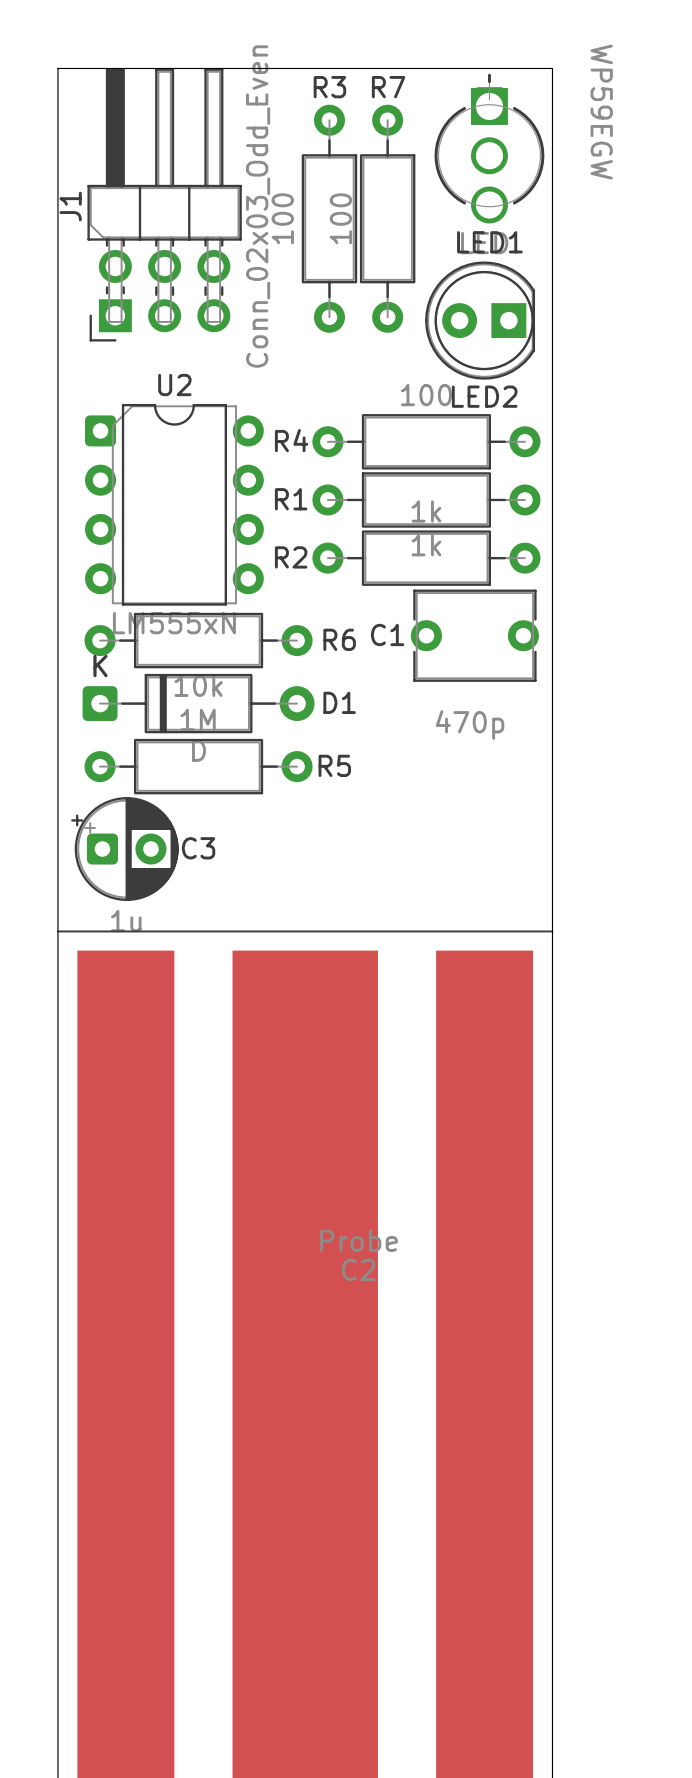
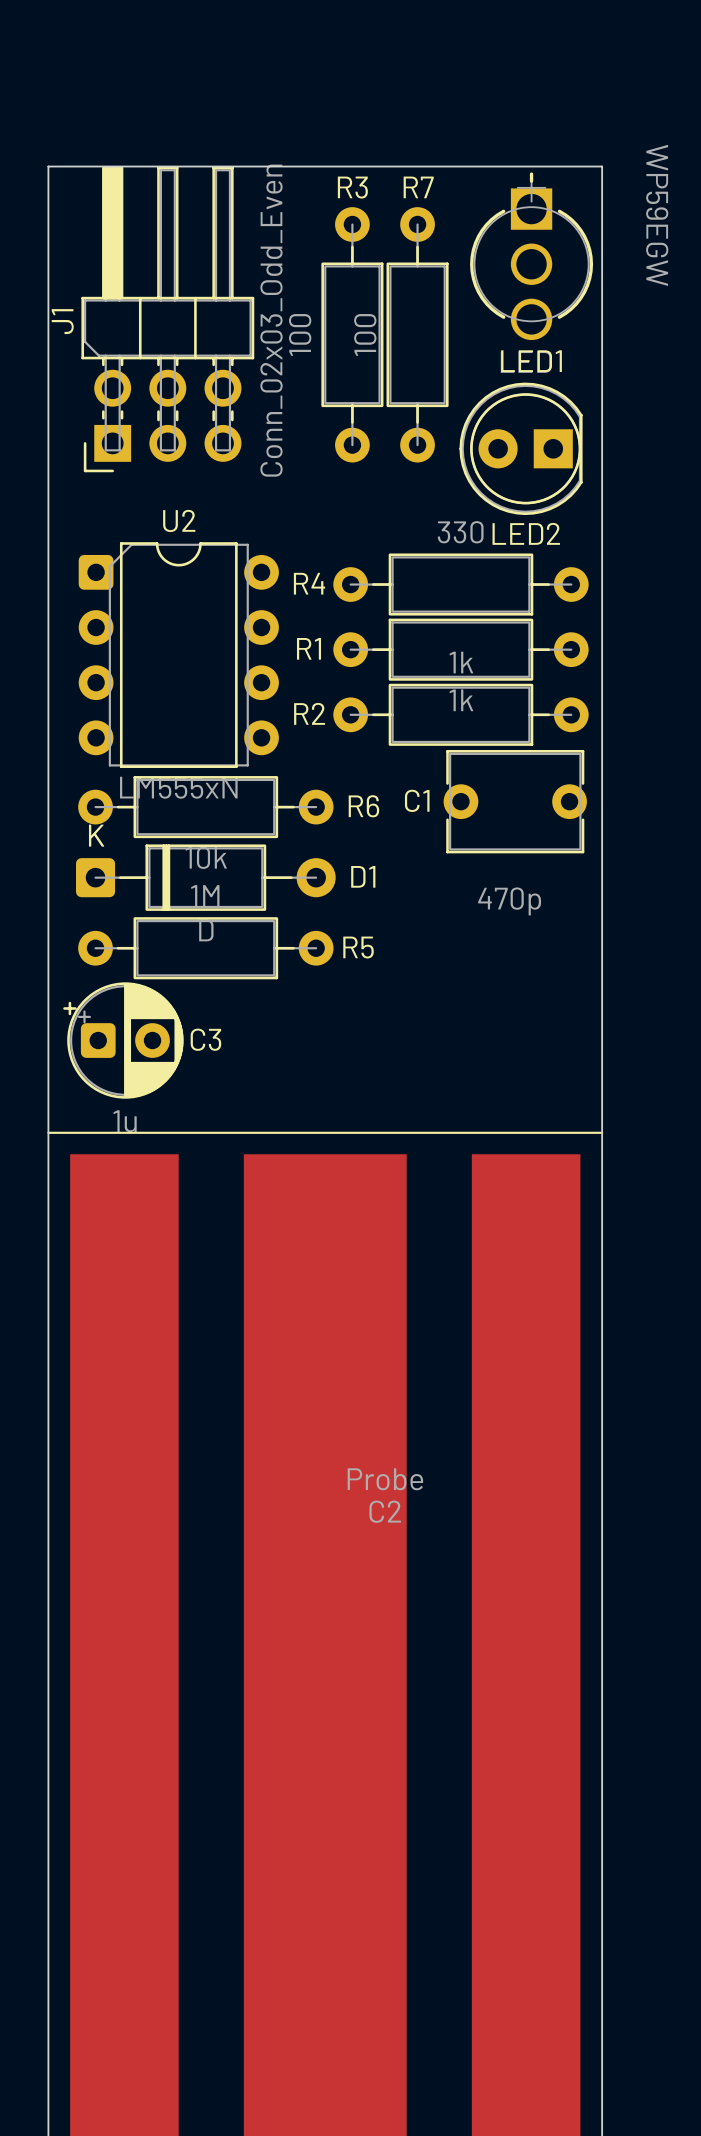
R4 value: 100 (426, 395) -> 330 (460, 532)

